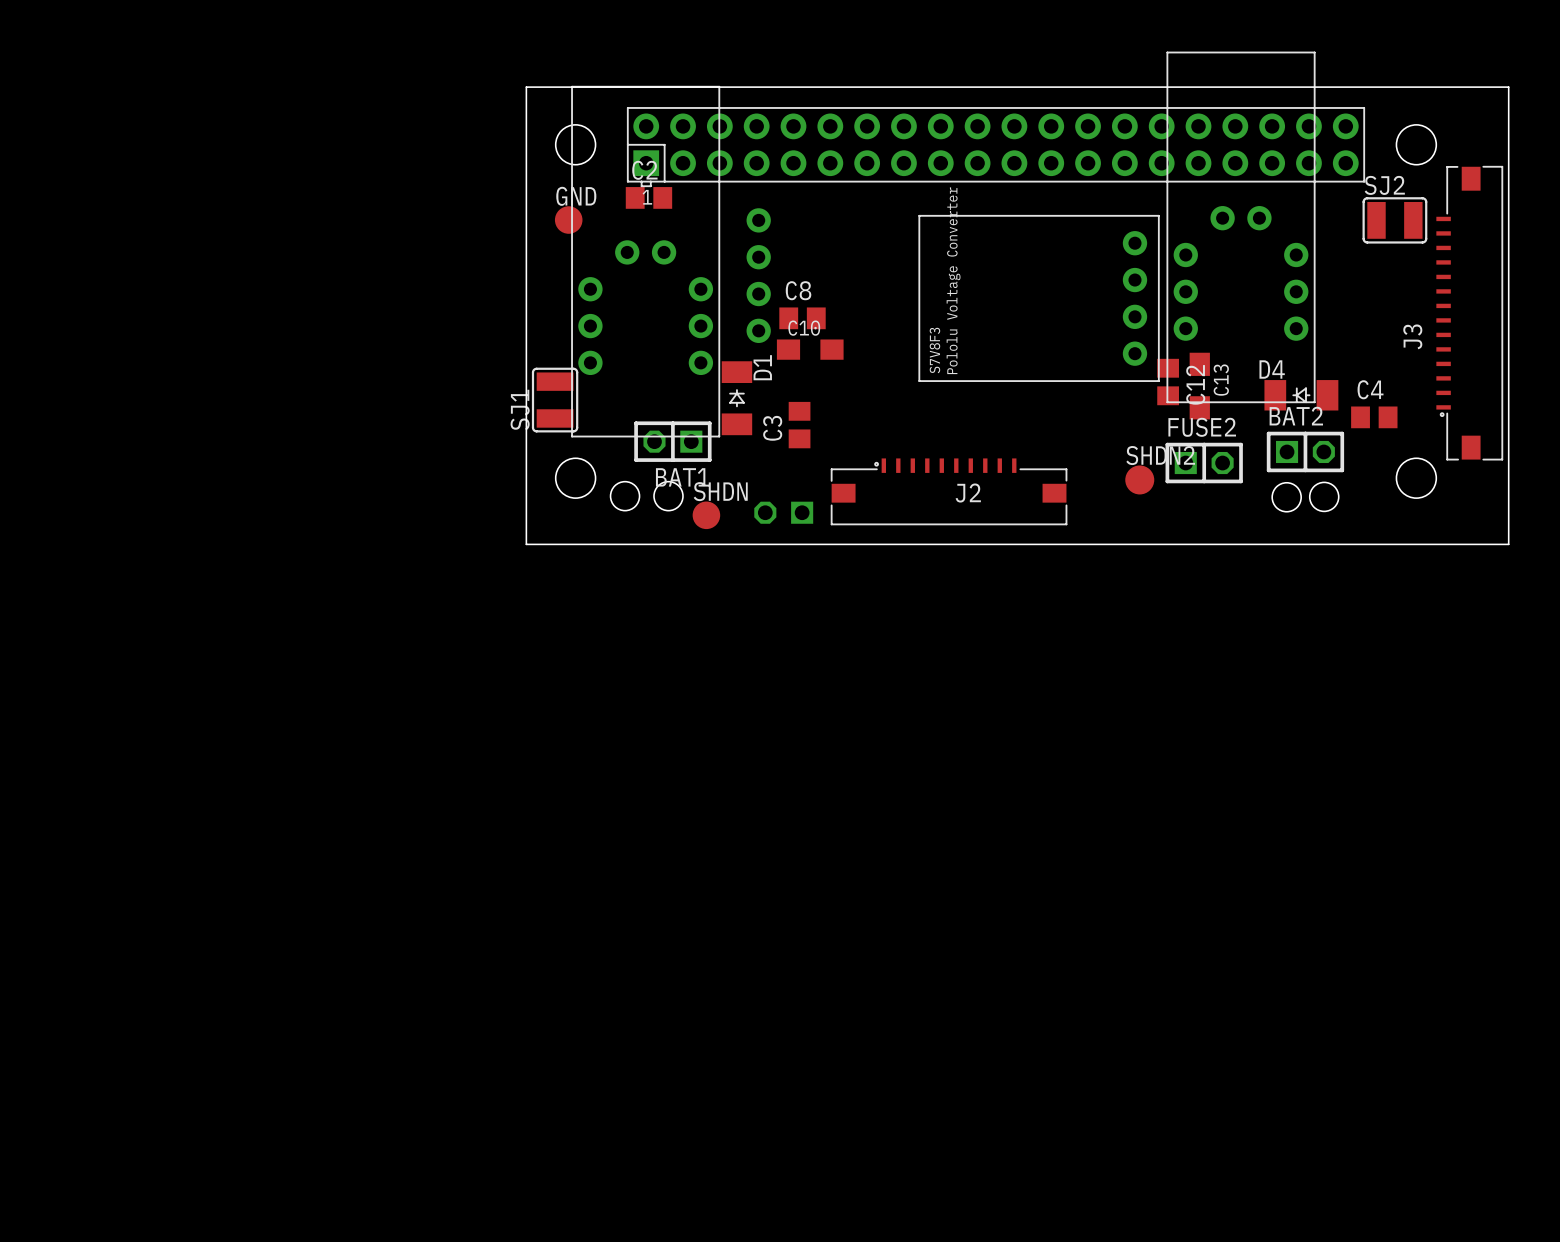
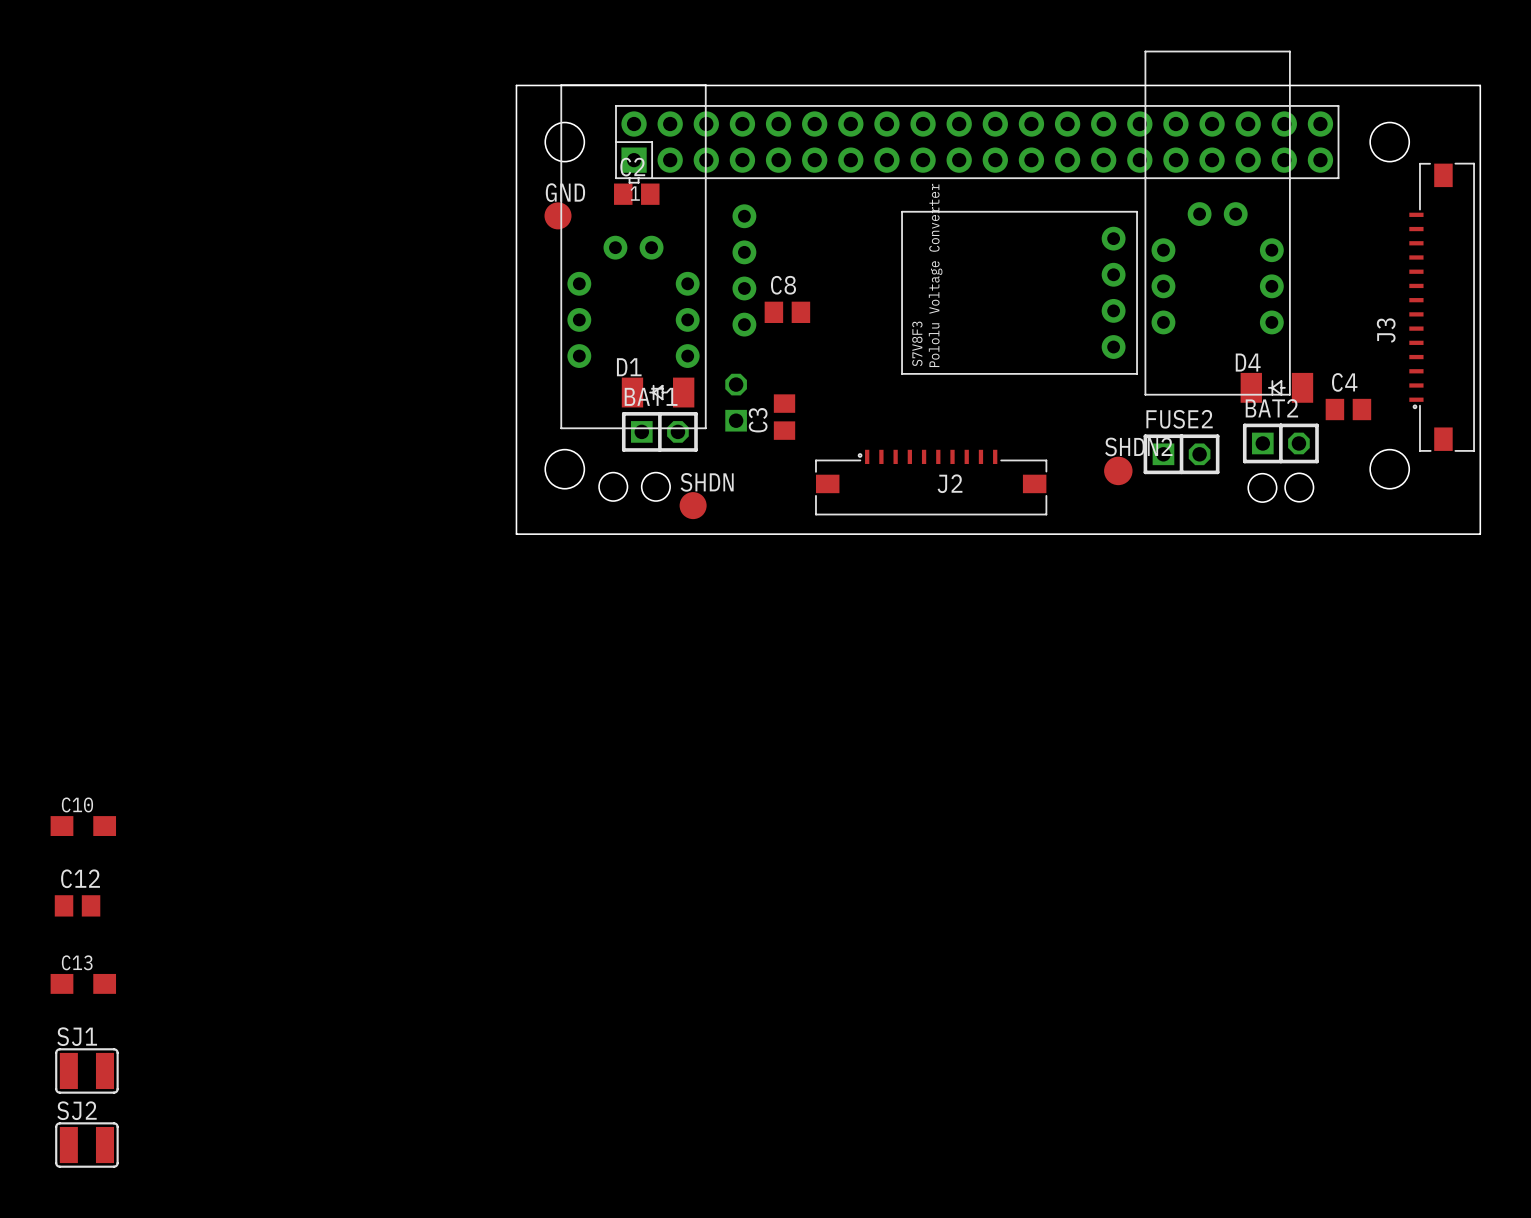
SJ2 position: (1394, 220) -> (86, 1145)
C10 position: (810, 349) -> (83, 826)
D1 name position: D1 (762, 367) -> D1 (629, 367)
C13 name position: C13 (1221, 380) -> C13 (77, 962)
C12 rotation: 0° (1168, 382) -> 90° clockwise (77, 905)
C12 position: (1168, 382) -> (77, 905)
C12 name position: C12 (1195, 384) -> C12 (80, 878)
C13 rotation: 0° (1199, 386) -> 90° clockwise (83, 983)
C13 position: (1199, 386) -> (83, 983)
D1 rotation: 0° (736, 398) -> 90° clockwise (658, 392)
D1 position: (736, 398) -> (658, 392)
SJ1 rotation: 0° (555, 400) -> 90° clockwise (86, 1070)
SJ1 position: (555, 400) -> (86, 1070)
BAT1 rotation: 0° (672, 441) -> 180° (659, 431)
part rotation: 0° (783, 512) -> 90° clockwise (736, 402)
part position: (783, 512) -> (736, 402)

